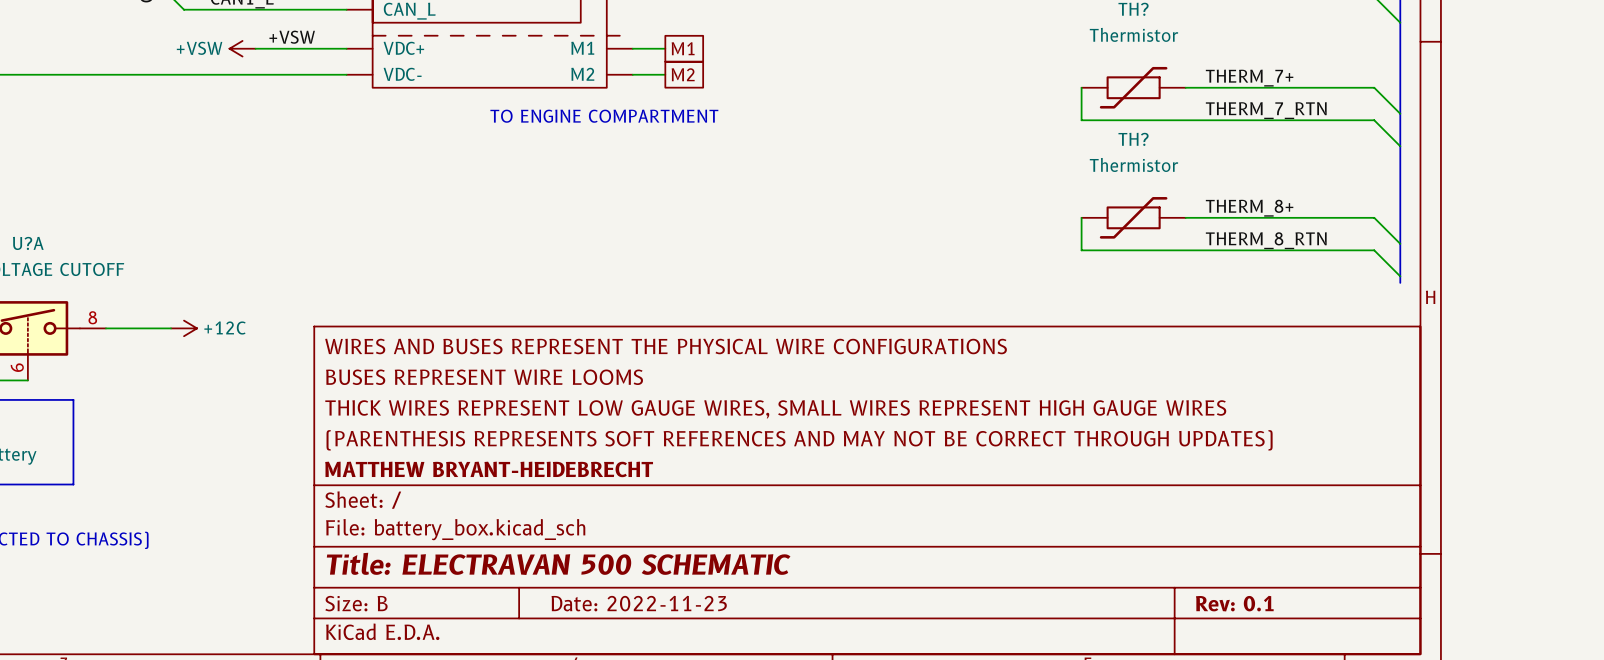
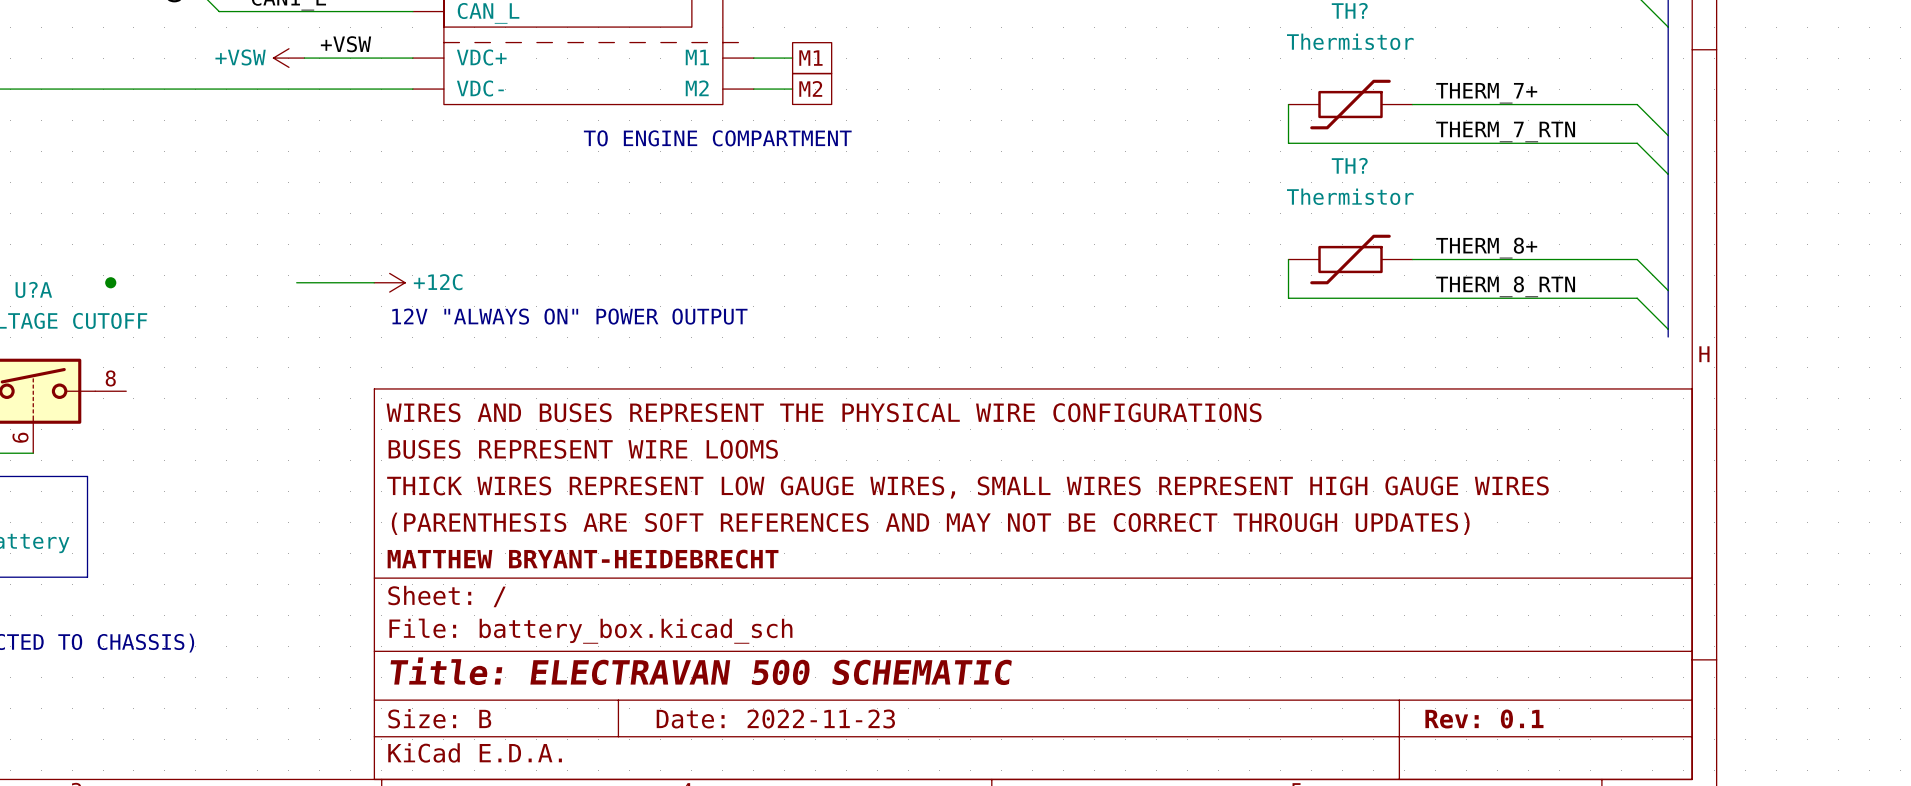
junction: none -> (110, 282)
text: none -> 12V "ALWAYS ON" POWER OUTPUT (569, 316)
wire: (105, 328) (171, 328) -> (296, 282) (374, 282)
power symbol position: +12C (184, 328) -> +12C (389, 282)
title block: (PARENTHESIS REPRESENTS SOFT REFERENCES AND MAY NOT BE CORRECT THROUGH UPDATES) (799, 440) -> (PARENTHESIS ARE SOFT REFERENCES AND MAY NOT BE CORRECT THROUGH UPDATES) (930, 523)

